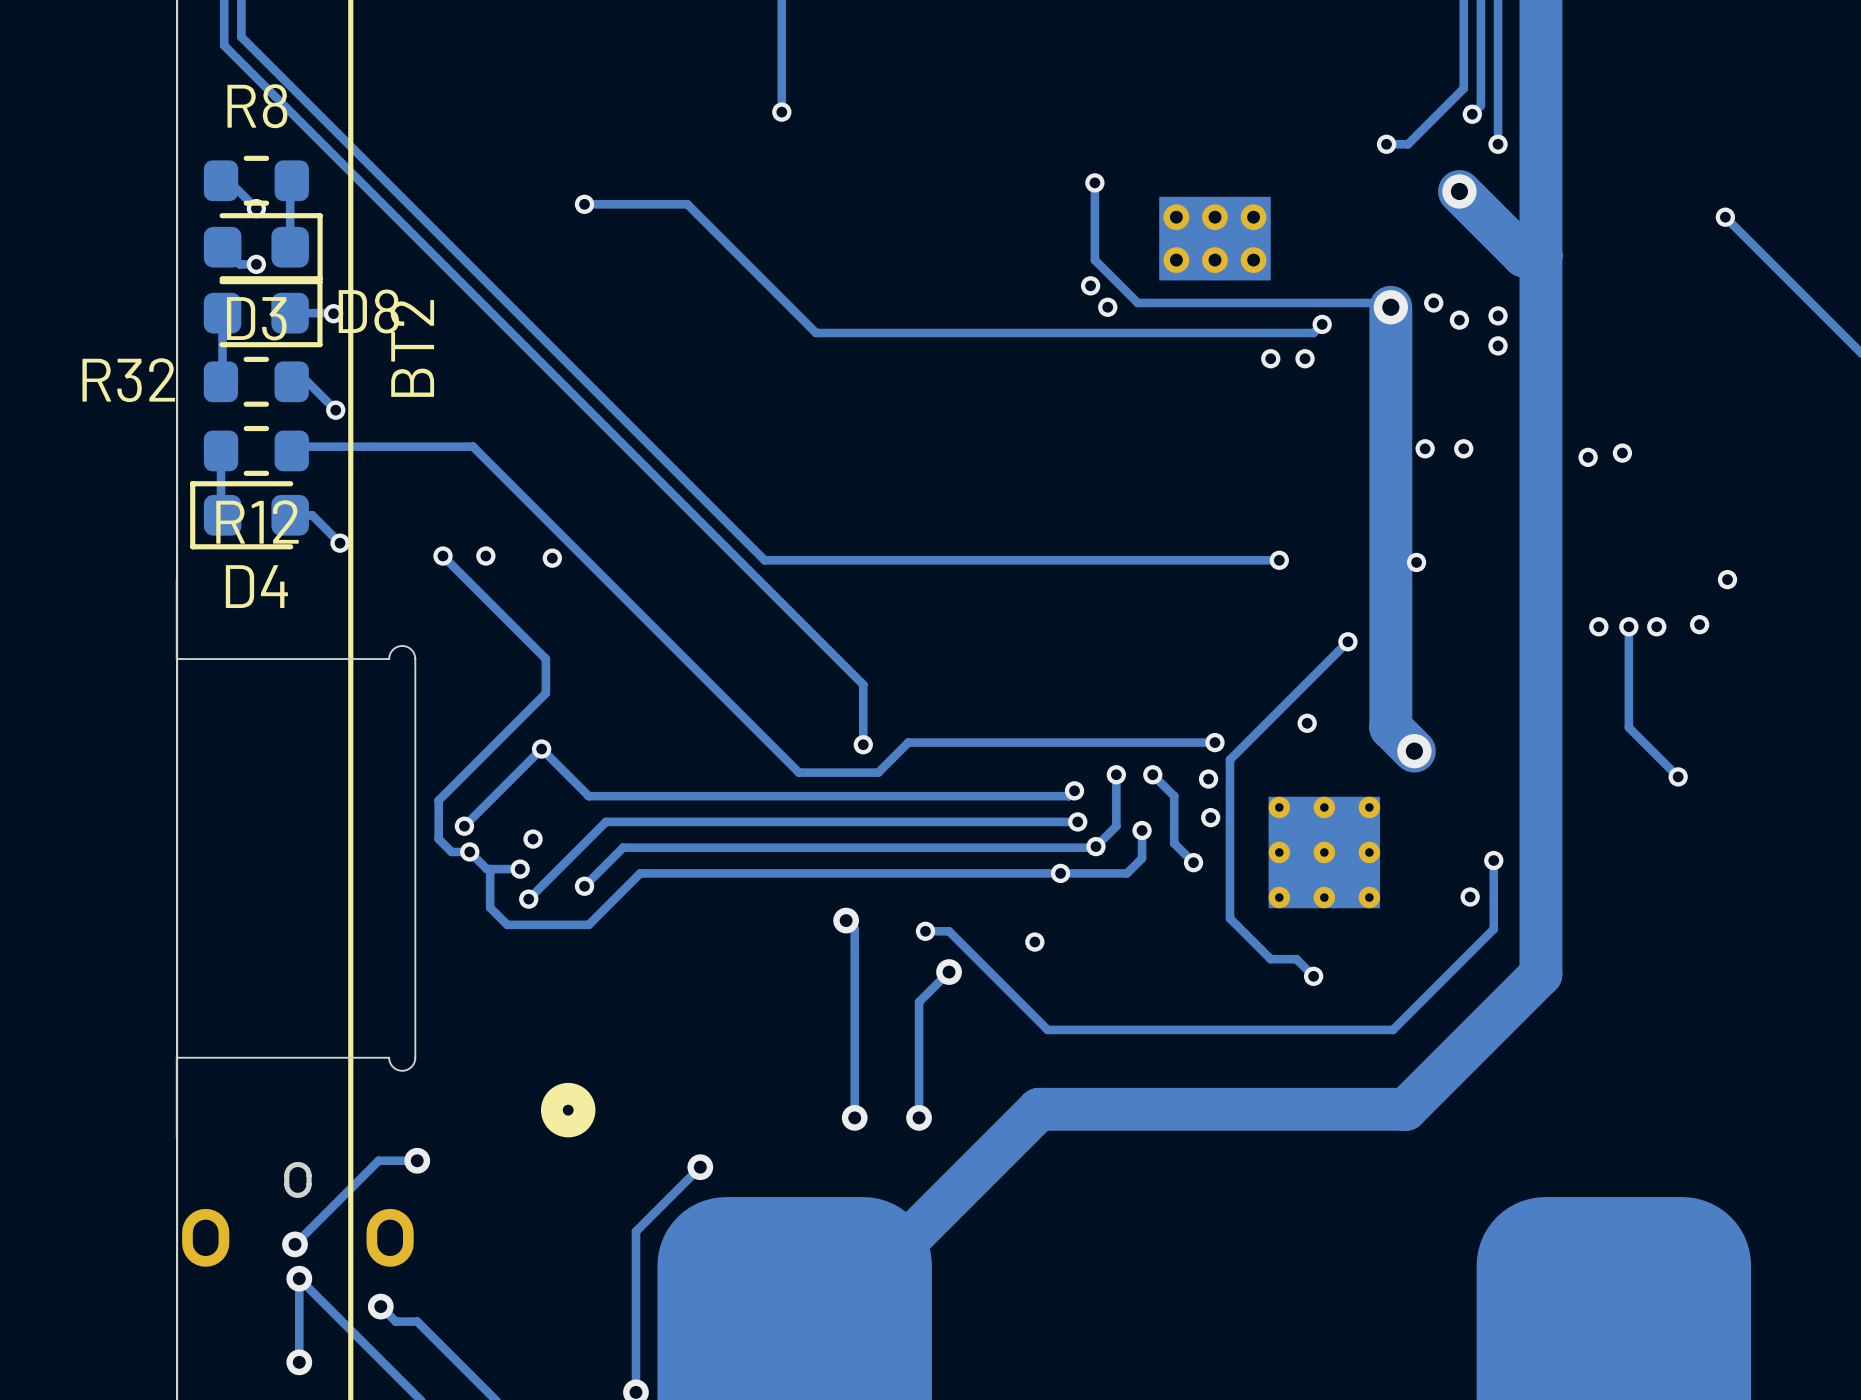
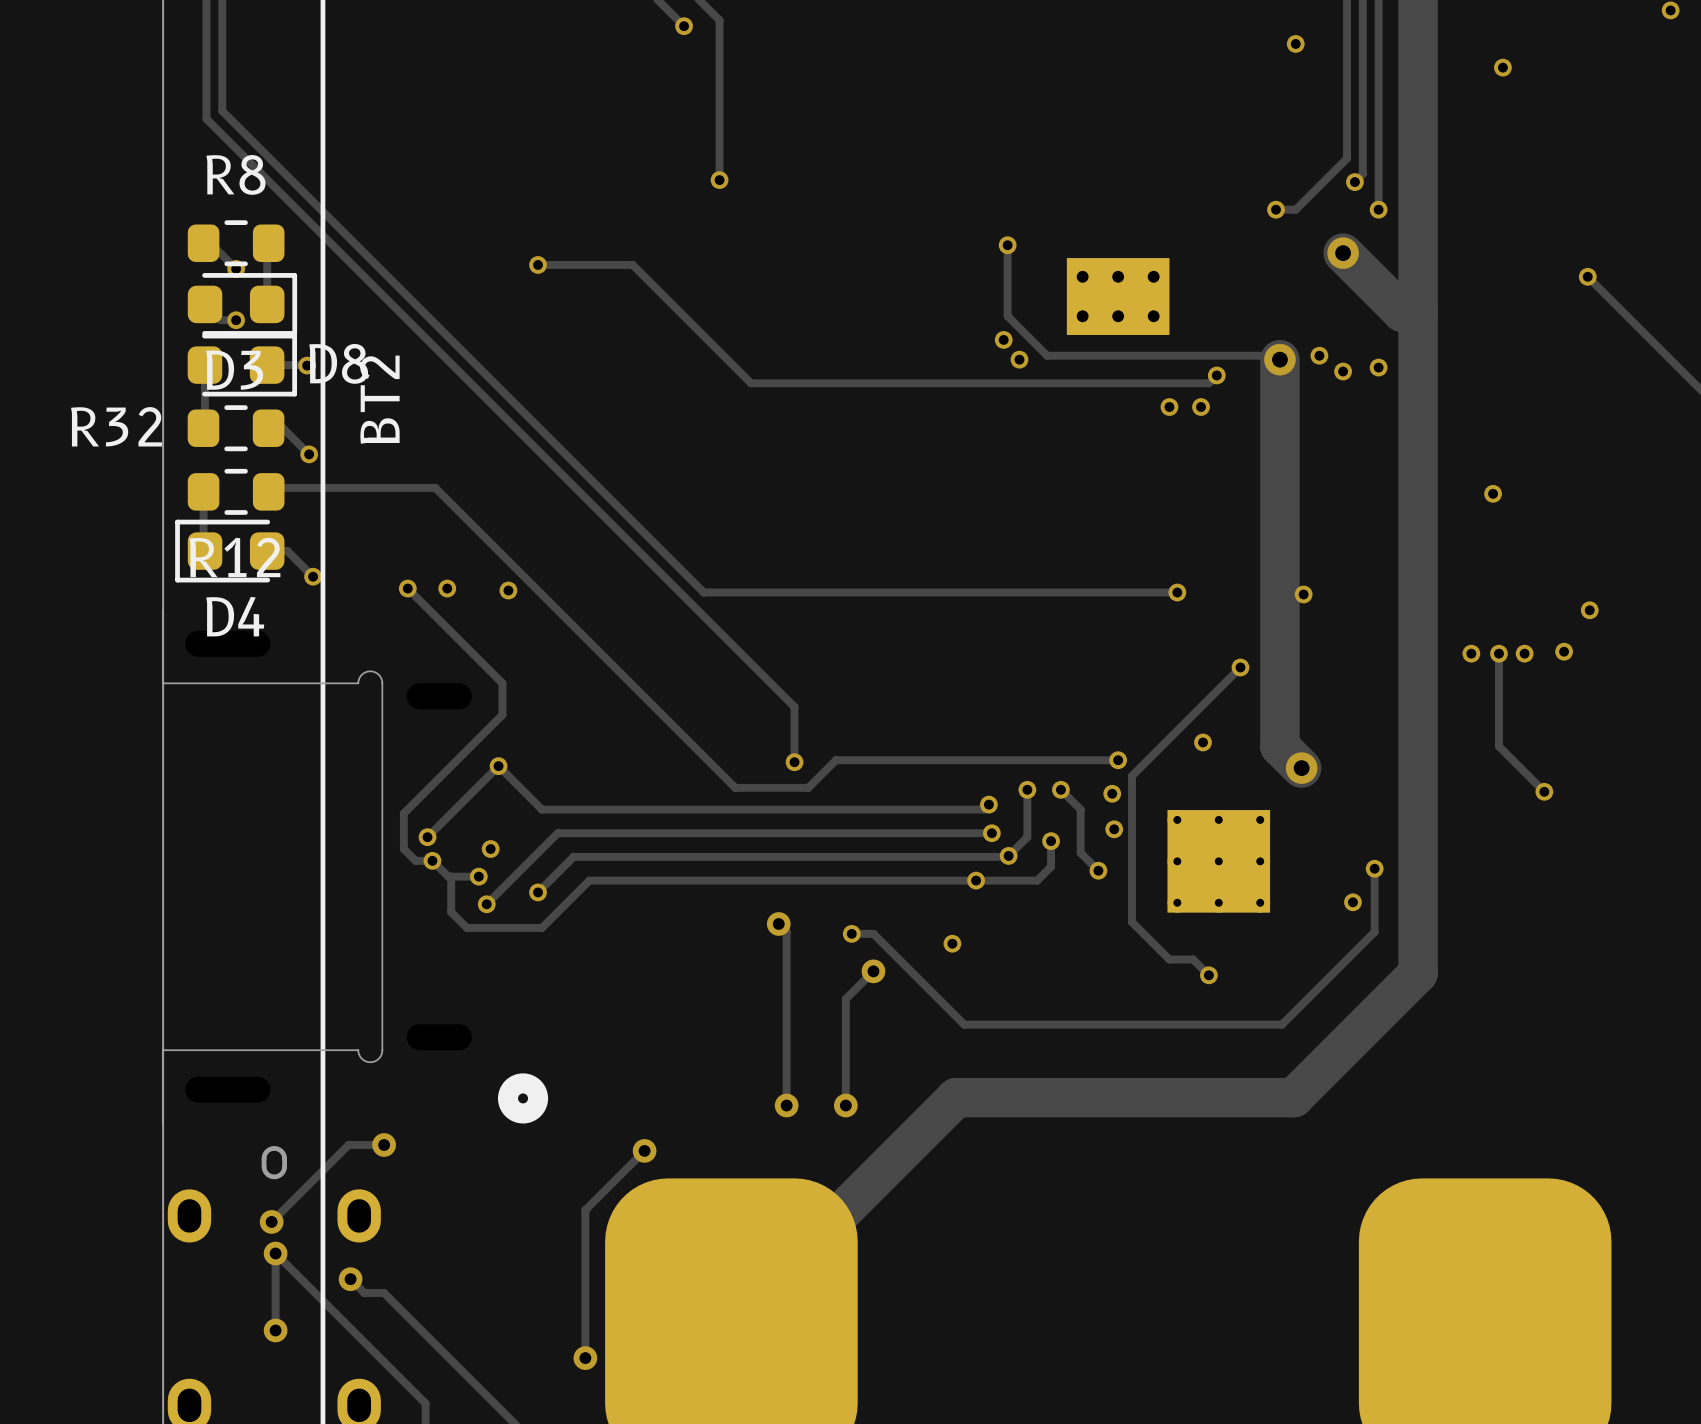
via: (1498, 345) -> none
via: (1425, 448) -> none
via: (1463, 448) -> none
via: (1588, 457) -> none

